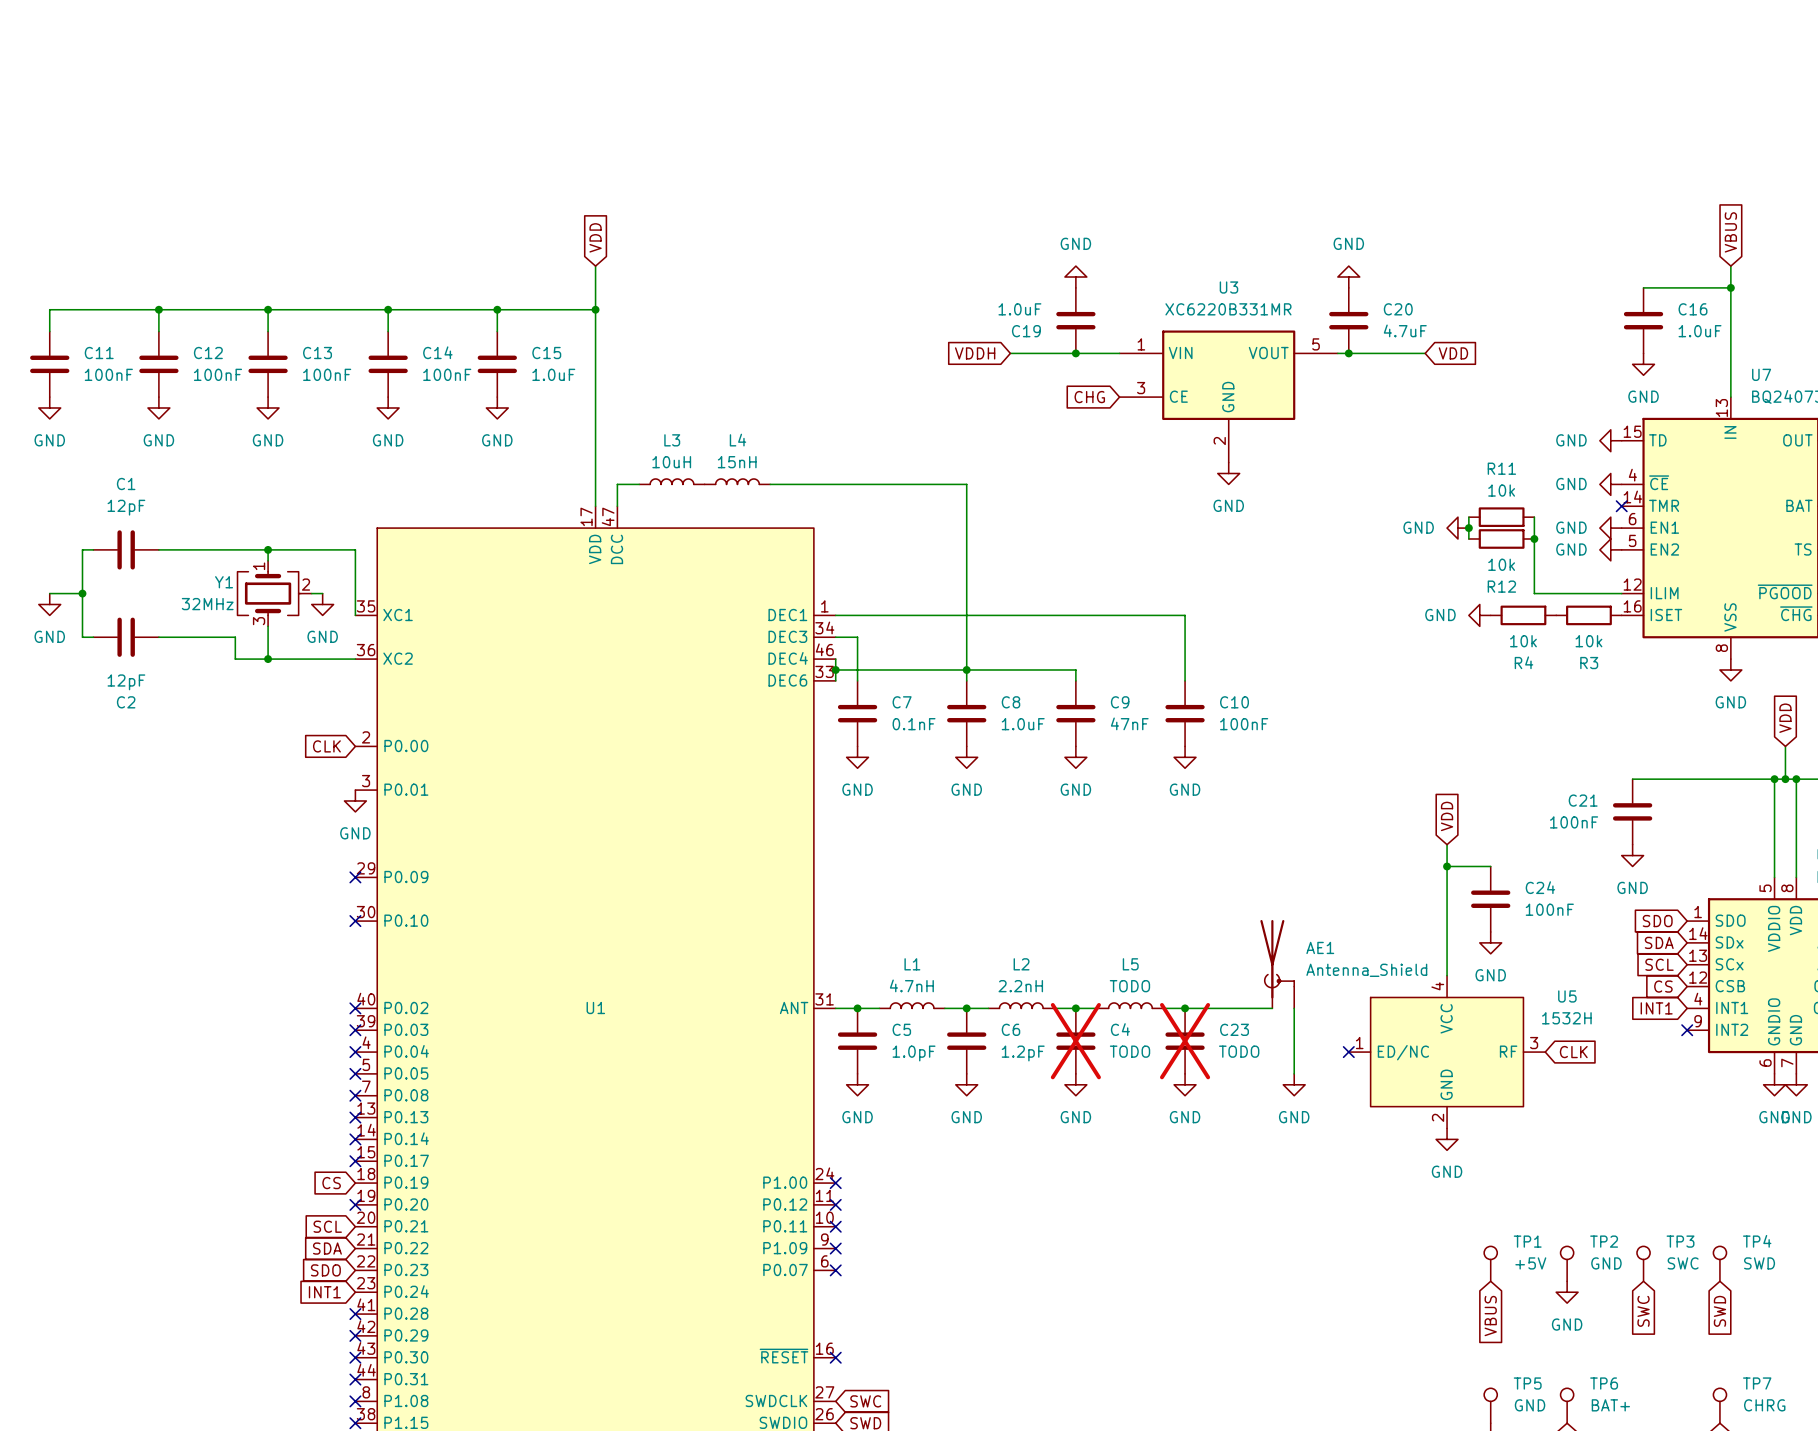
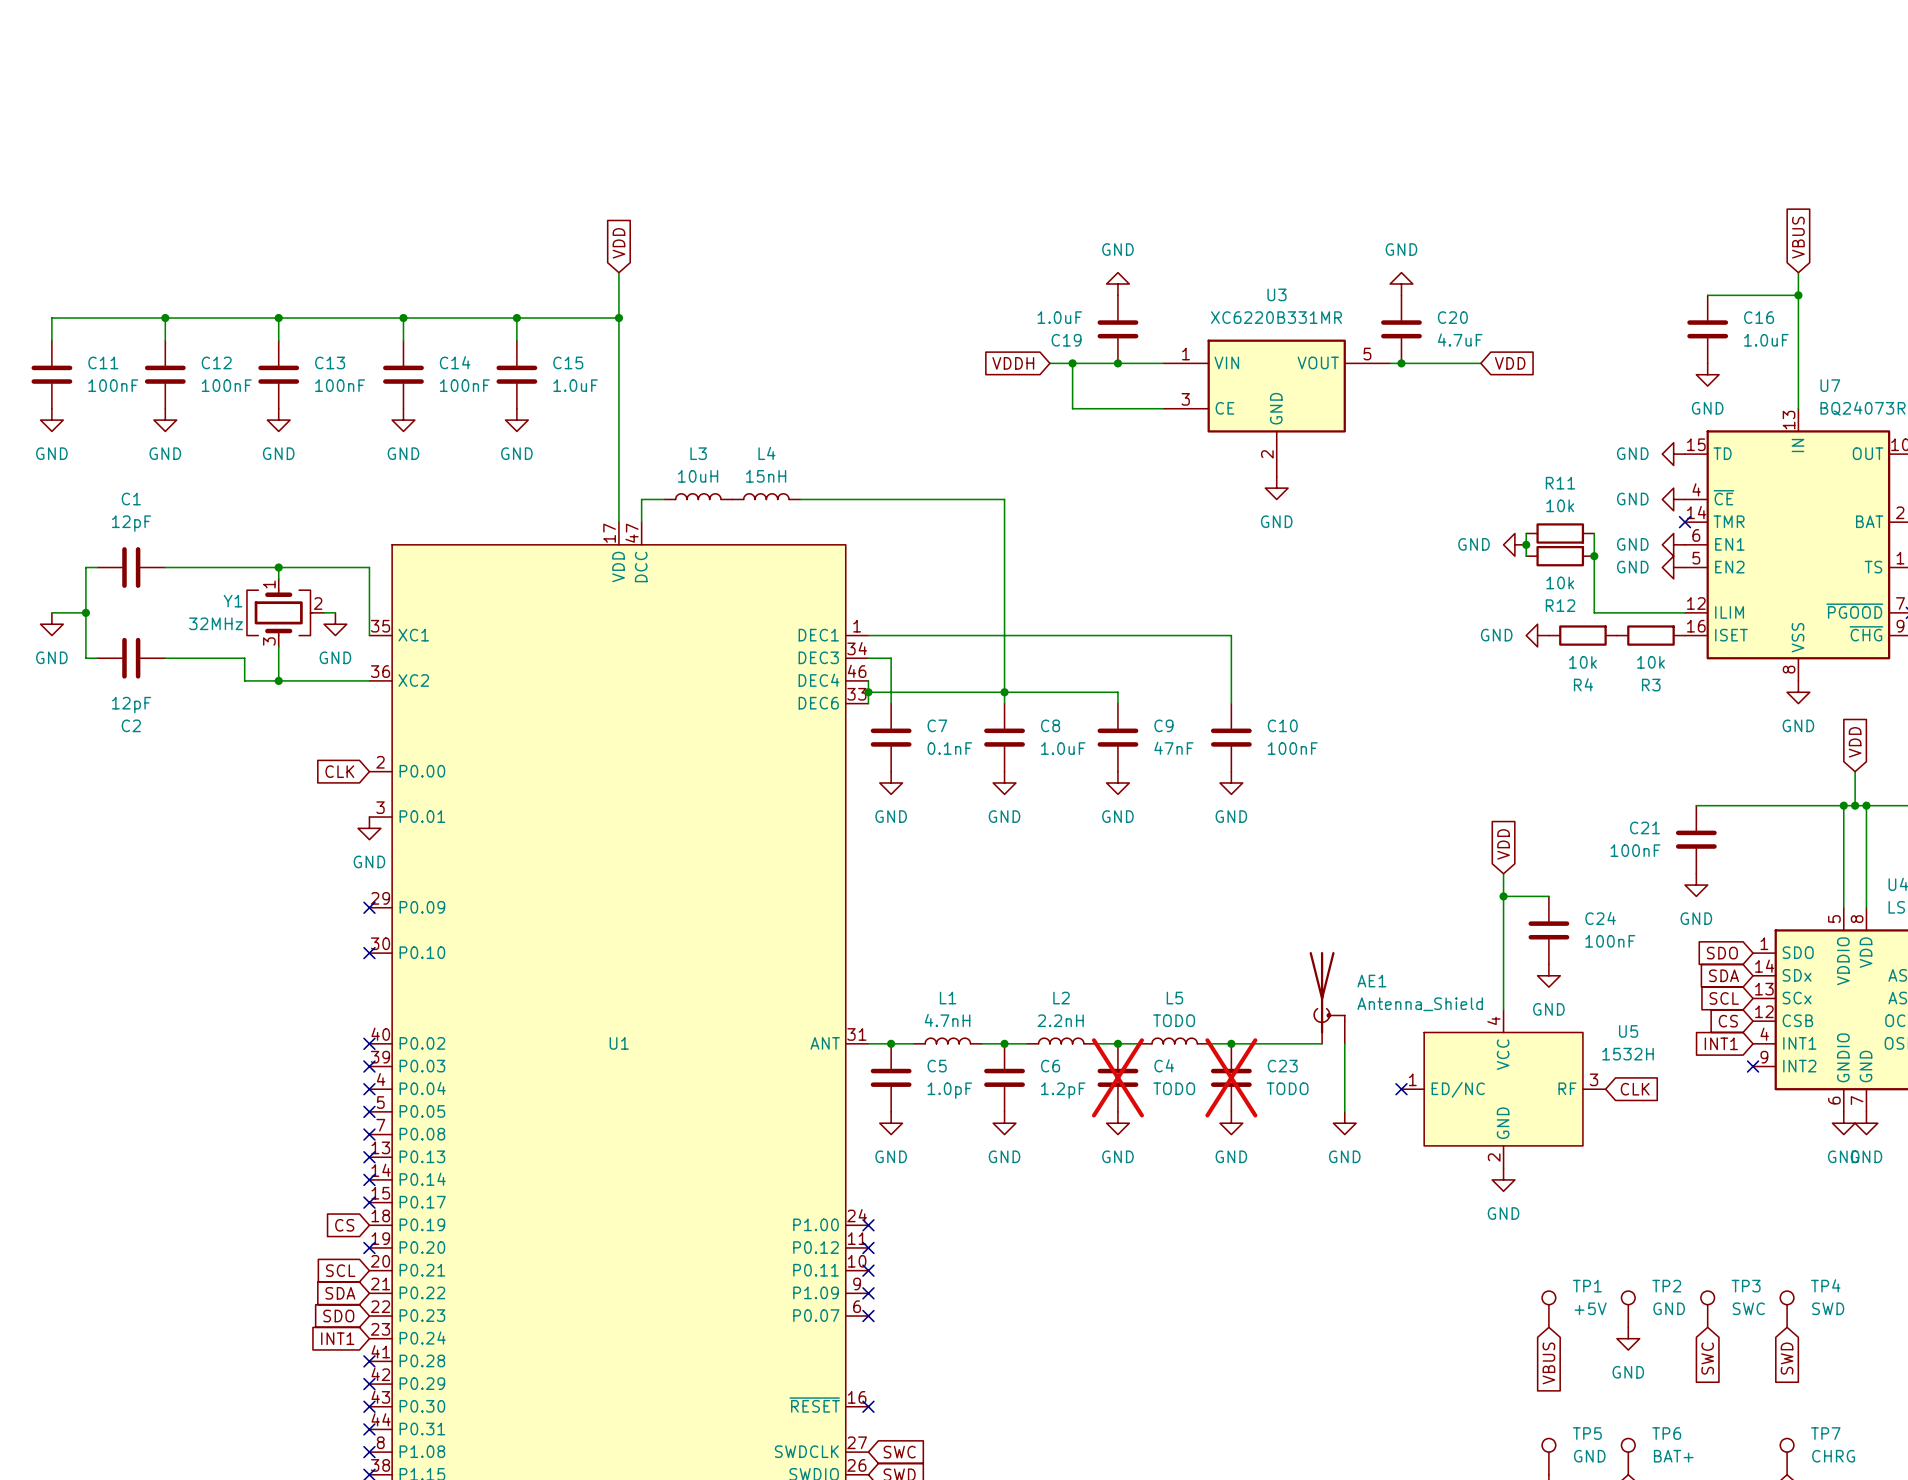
wire: none -> (1072, 363) (1072, 408) (1163, 408)
junction: none -> (1072, 363)
global label: CHG (1089, 397) -> none

